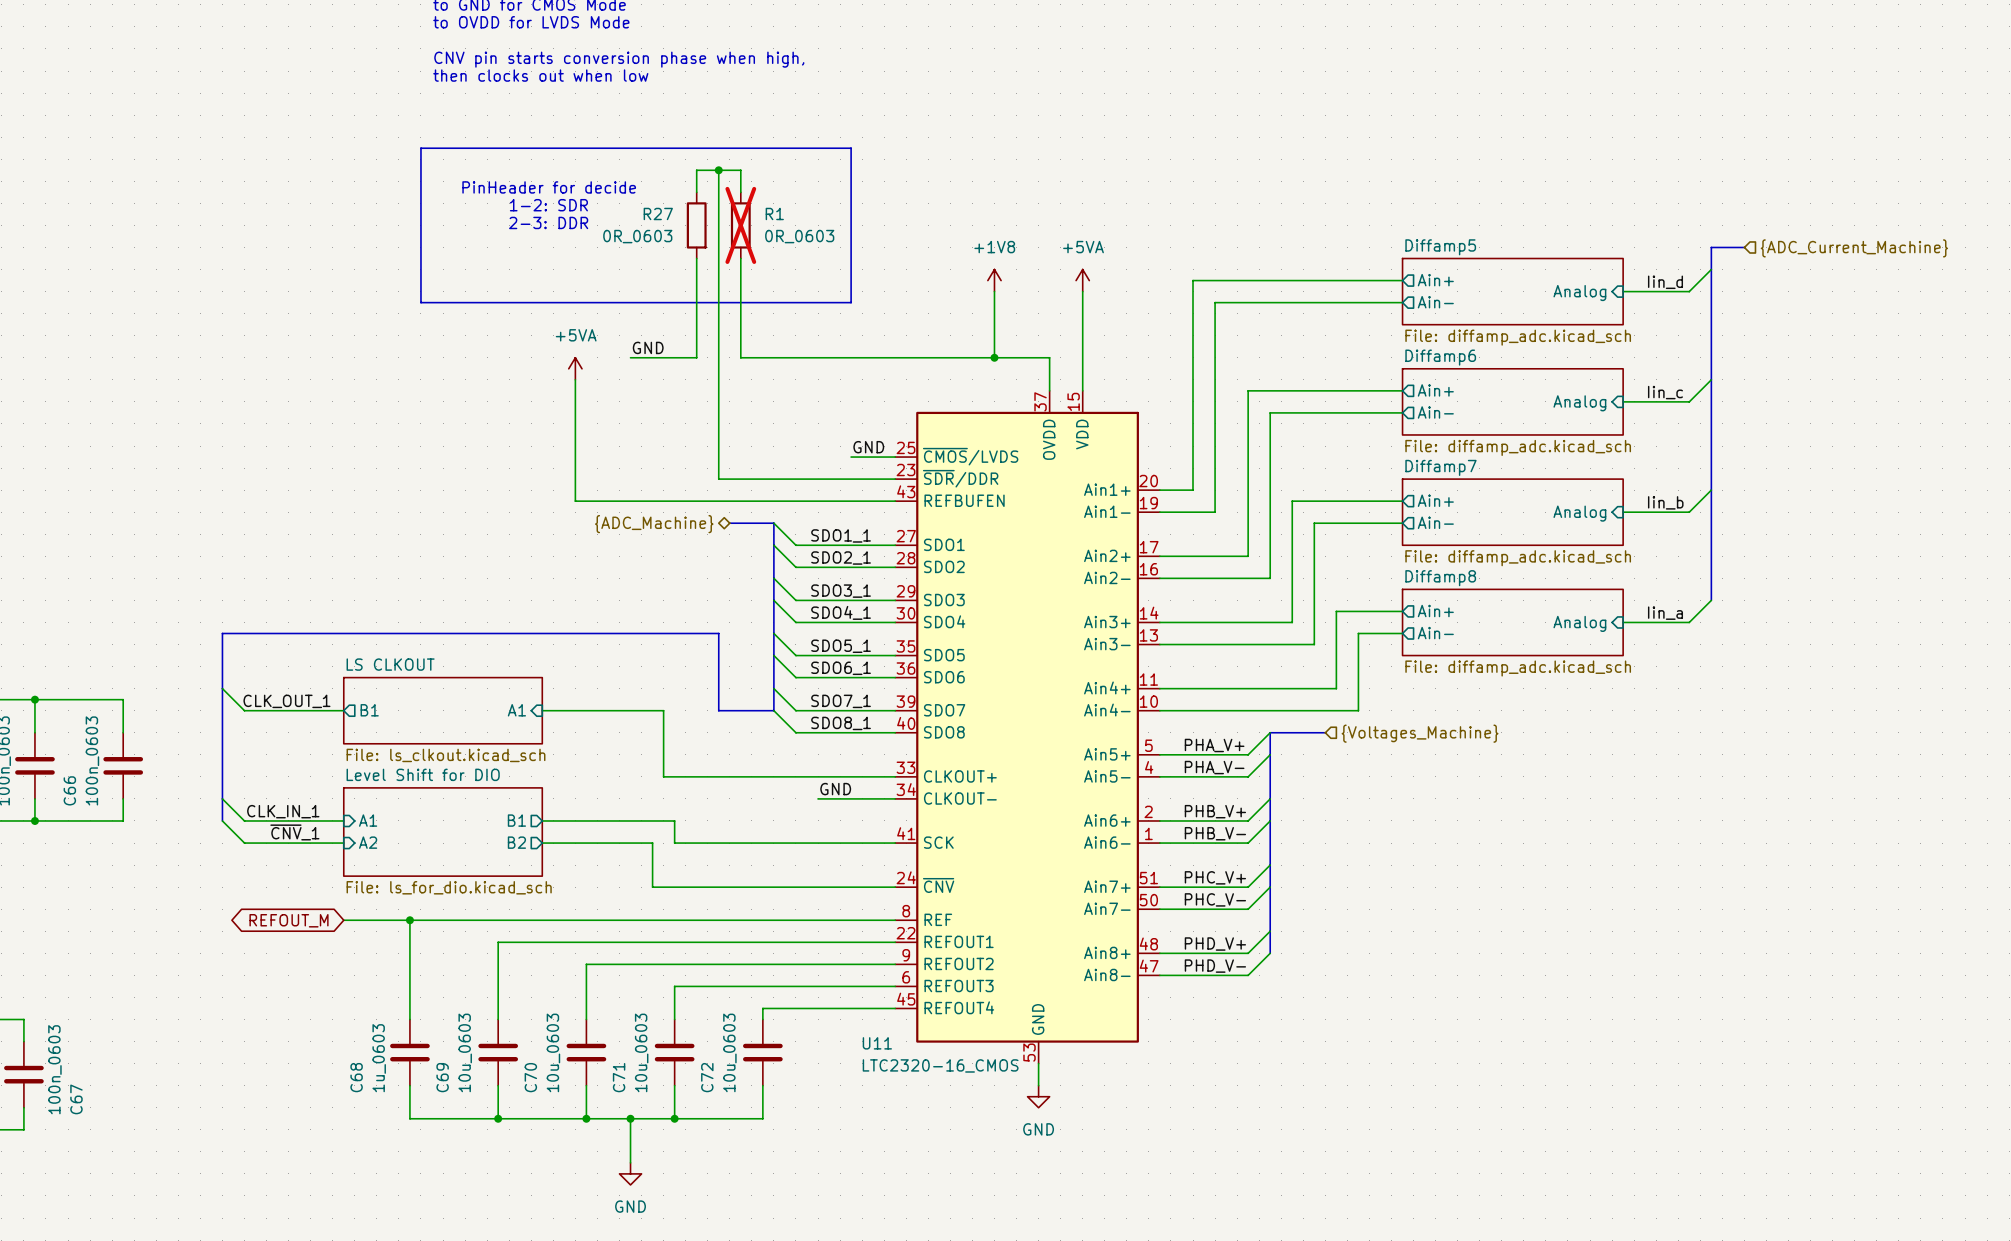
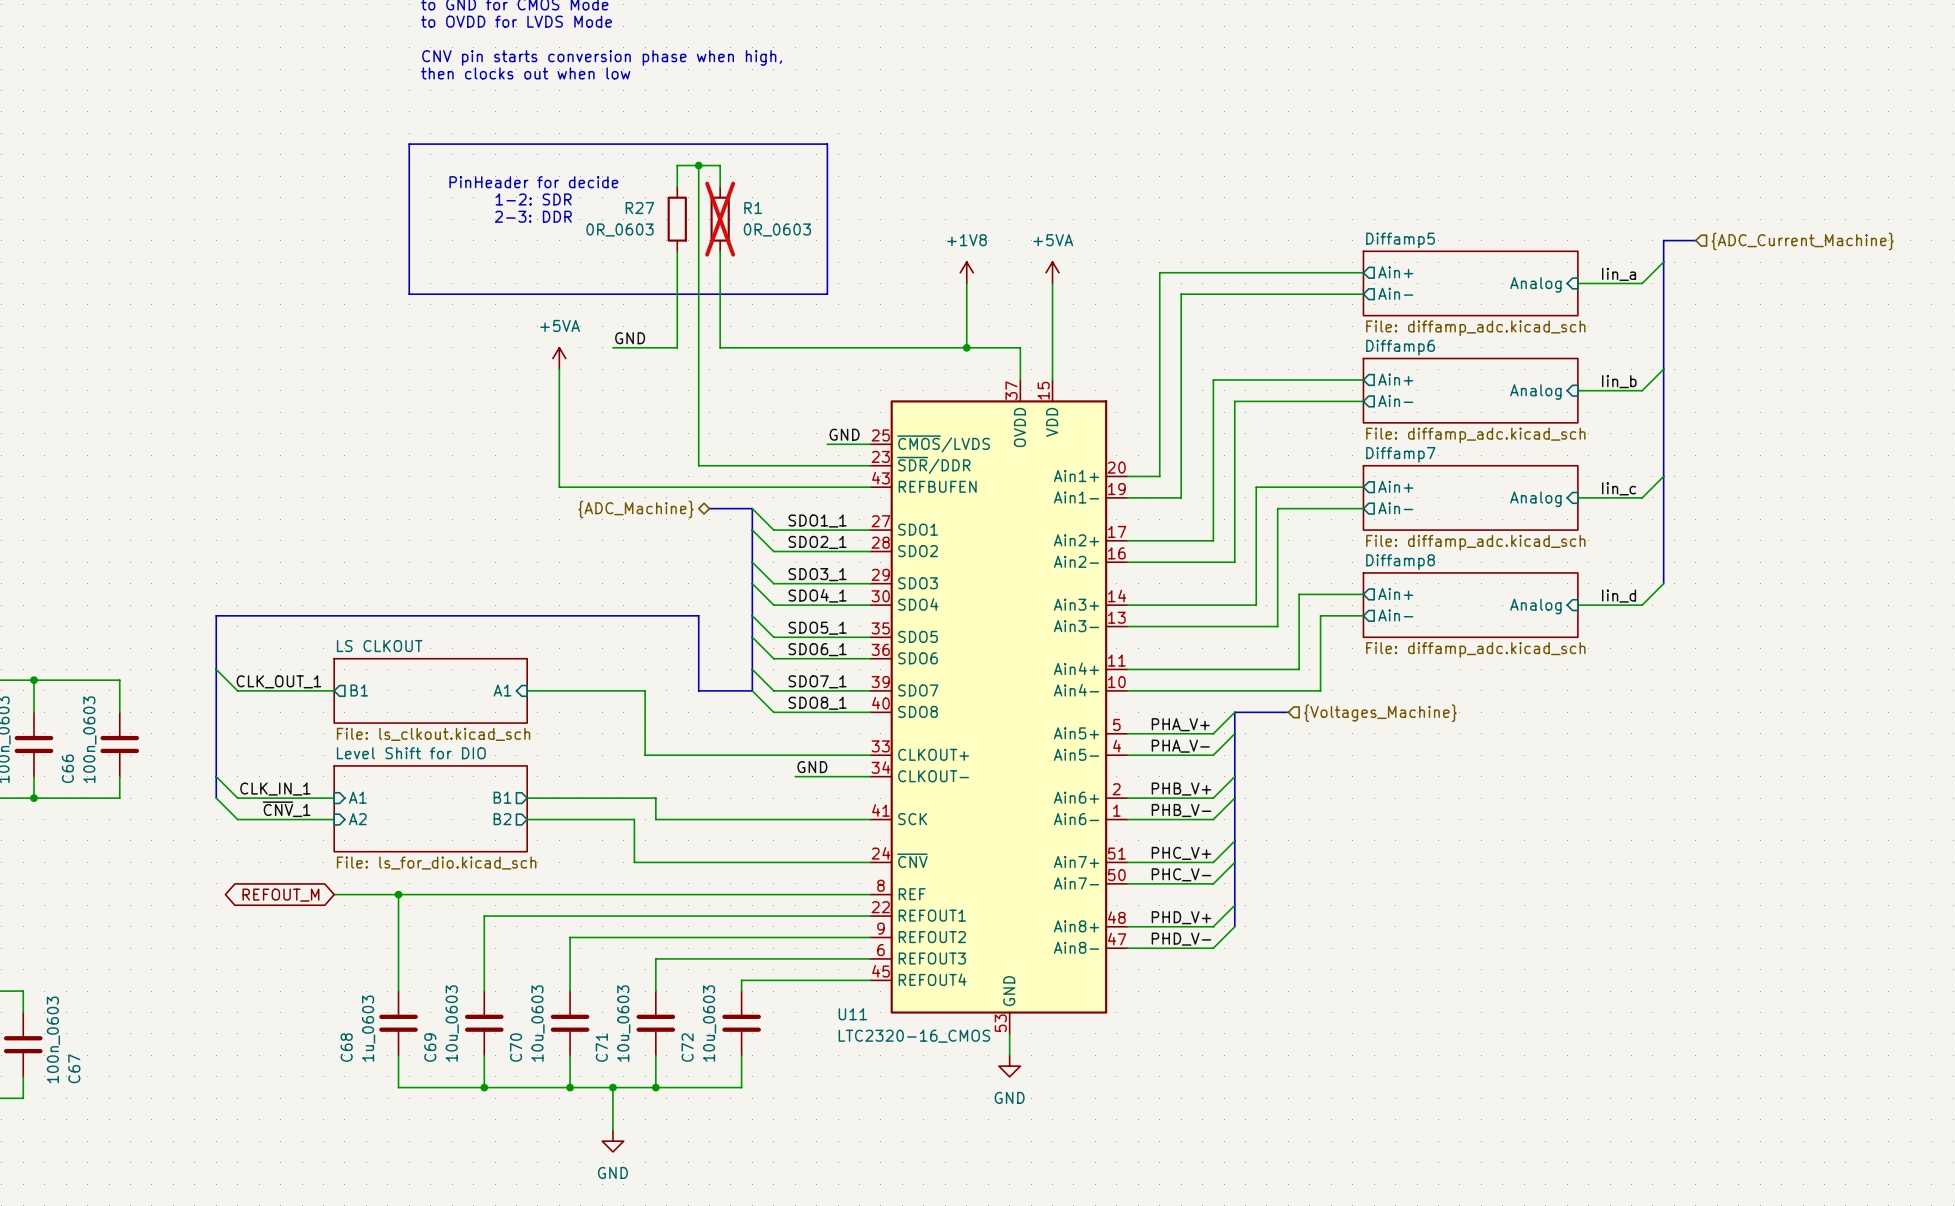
label: Iin_d (1665, 282) -> Iin_a (1619, 274)
label: Iin_c (1665, 392) -> Iin_b (1619, 381)
label: Iin_b (1665, 502) -> Iin_c (1619, 488)
label: Iin_a (1665, 613) -> Iin_d (1619, 596)

